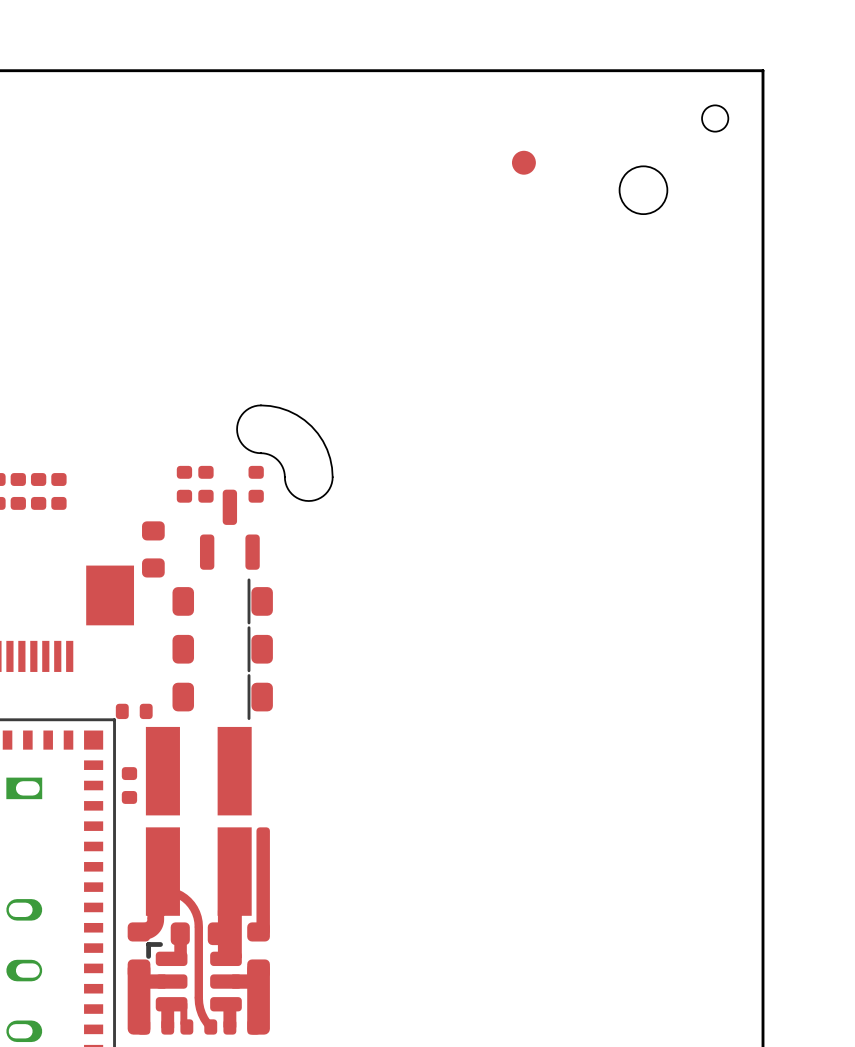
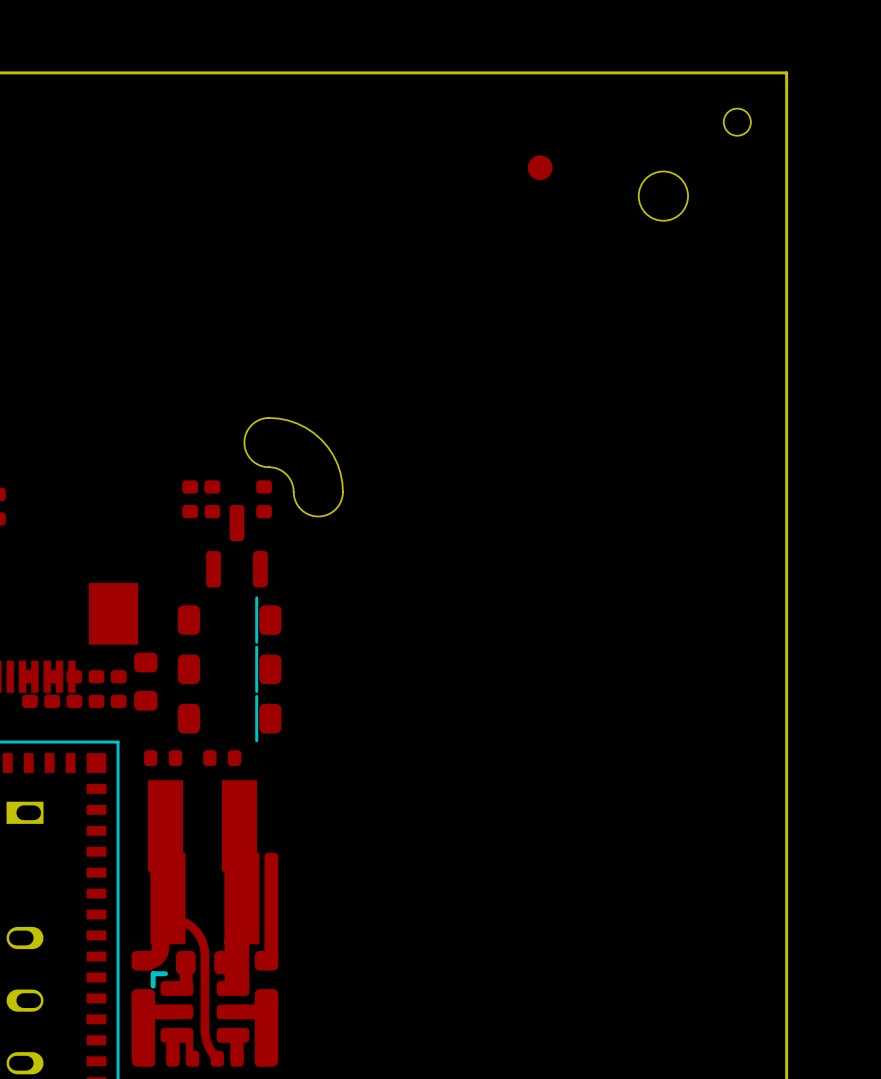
part: (18, 491) -> none
part: (38, 491) -> none
part: (58, 491) -> none
part position: (153, 549) -> (145, 681)
part: none -> (29, 689)
part: none -> (52, 689)
part: none -> (74, 689)
part: none -> (96, 689)
part: none -> (118, 689)
part: (134, 711) -> none
part: none -> (163, 758)
part: none -> (222, 758)
part position: (198, 771) -> (202, 825)
part: (129, 785) -> none

